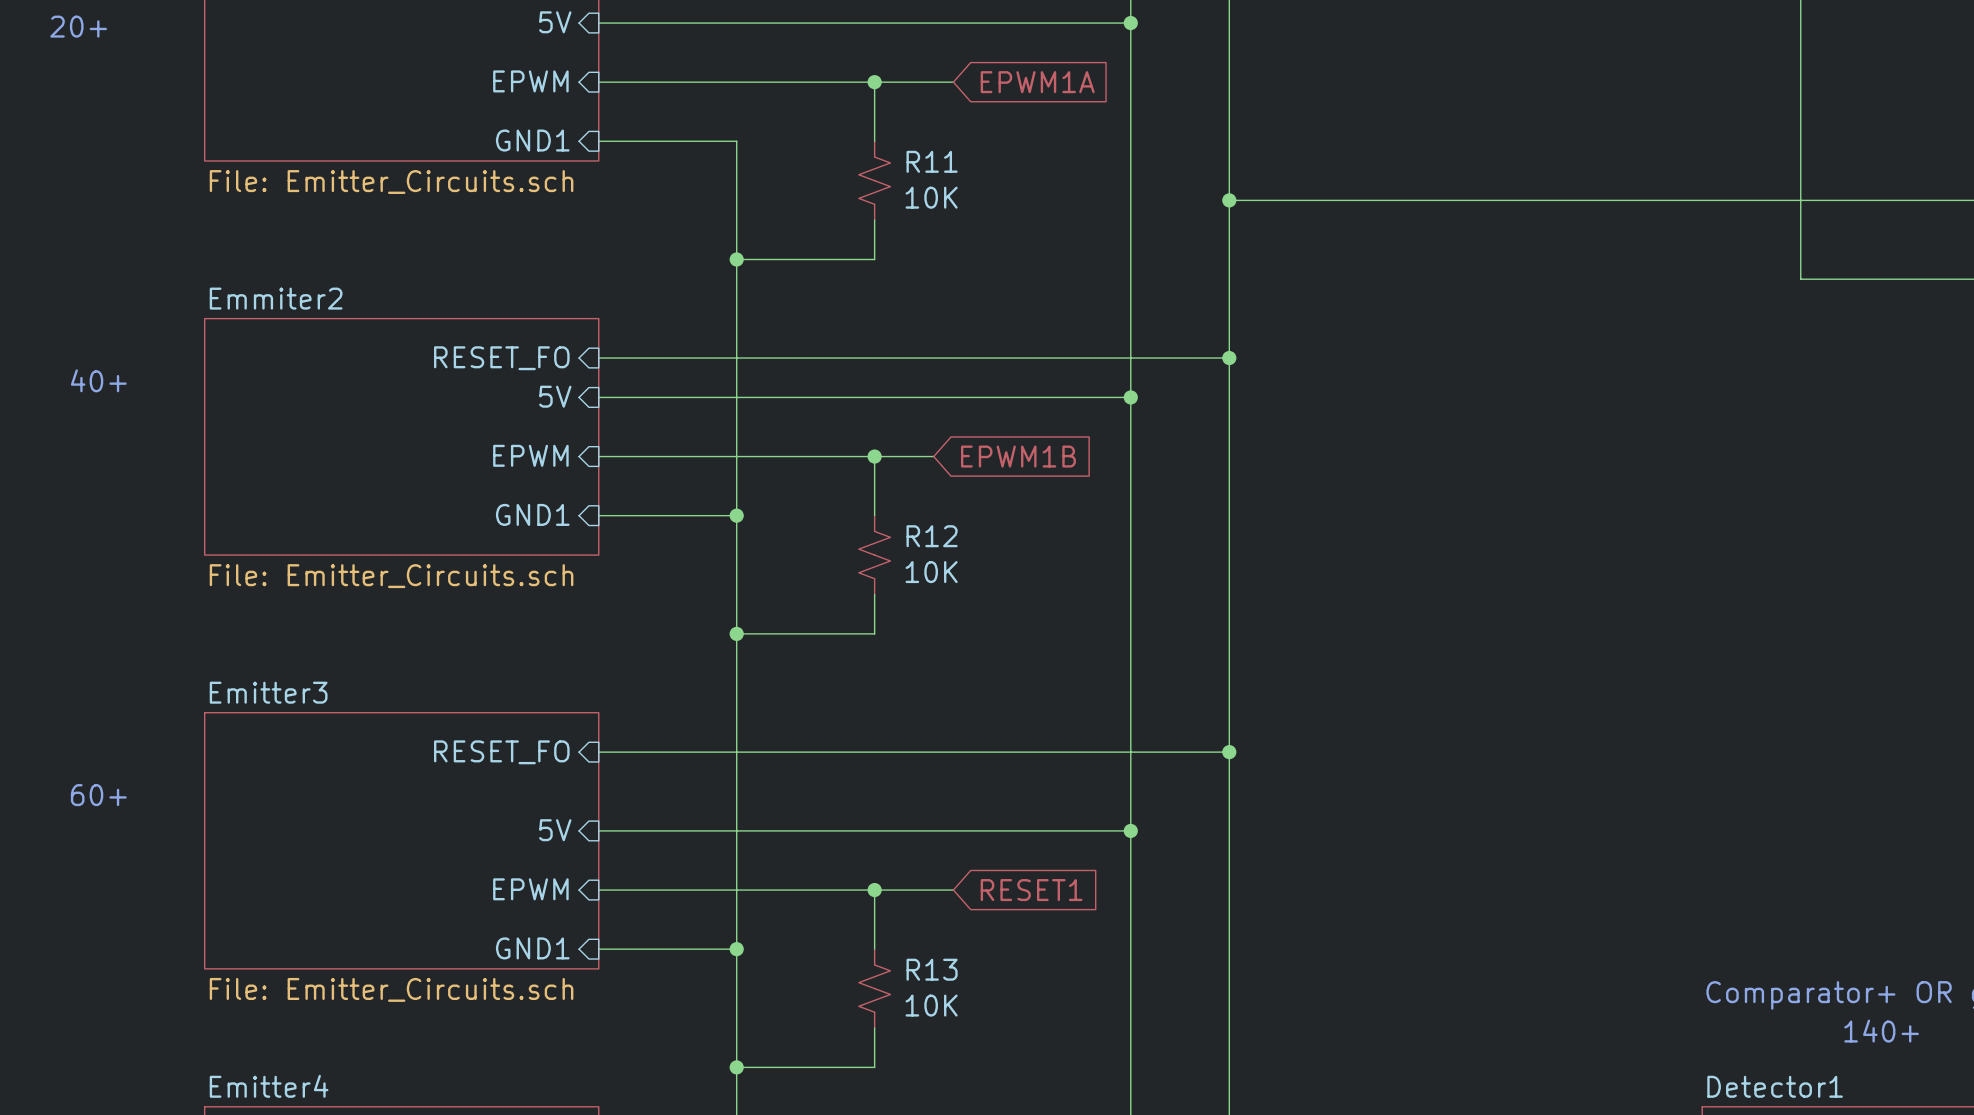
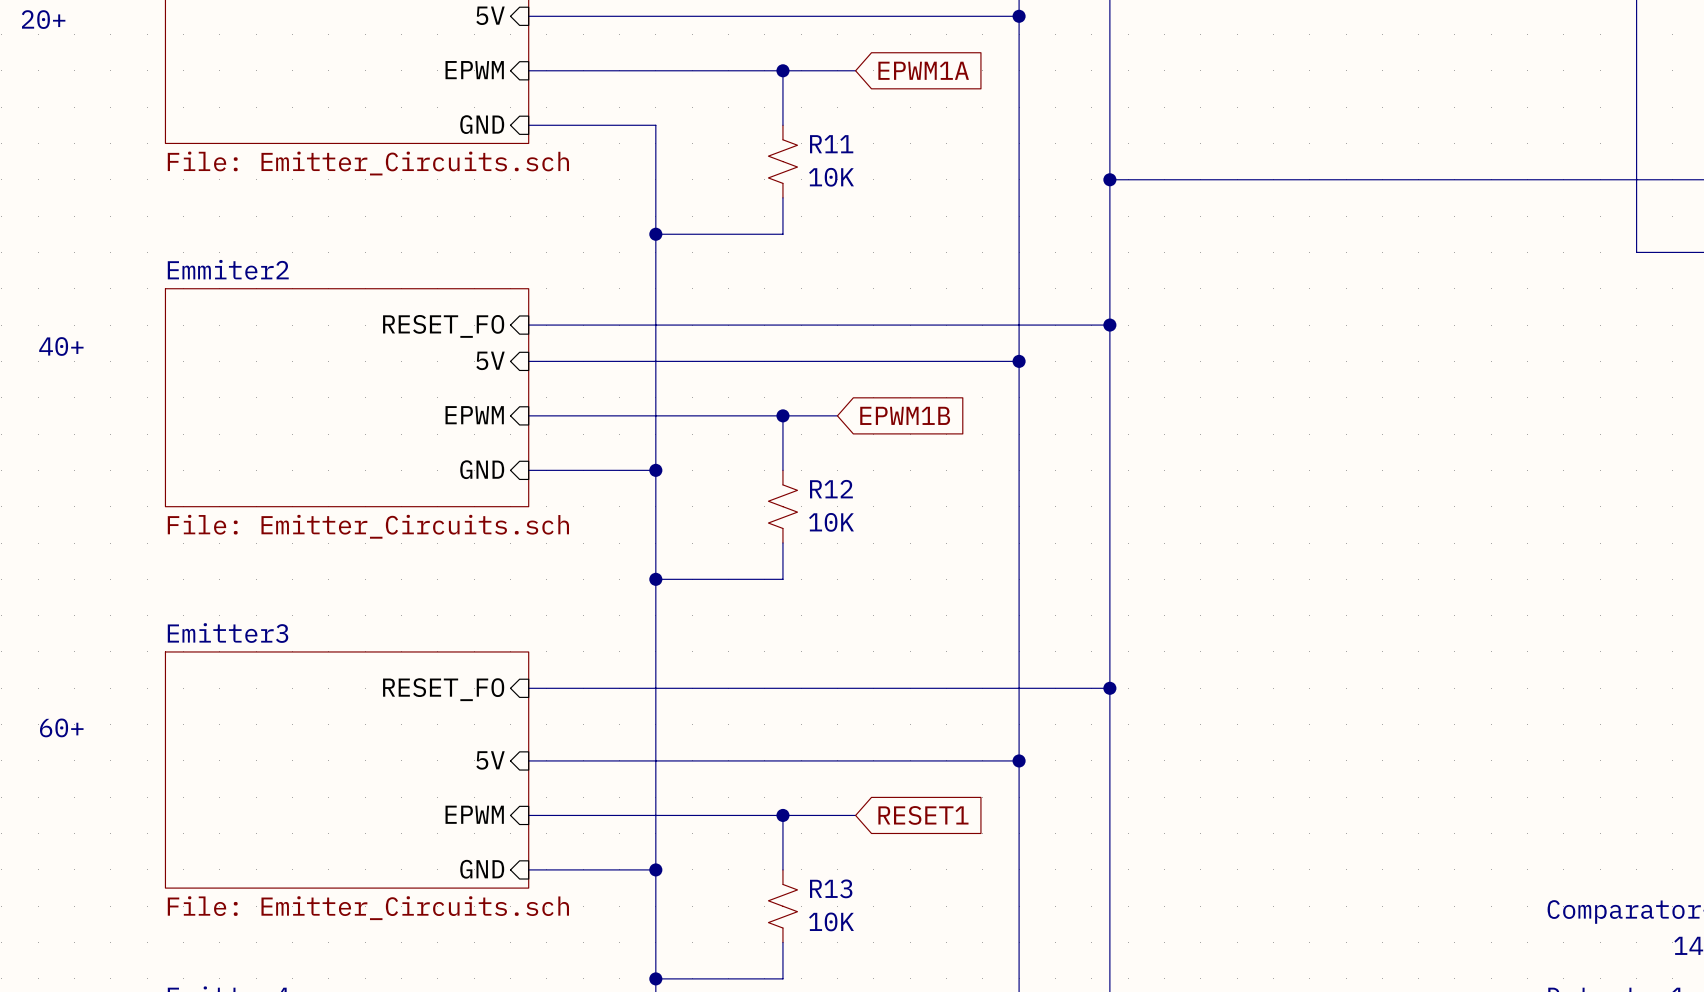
sheet pin: GND1 (532, 140) -> GND (482, 124)
sheet pin: GND1 (532, 514) -> GND (482, 469)
sheet pin: GND1 (532, 948) -> GND (482, 869)

